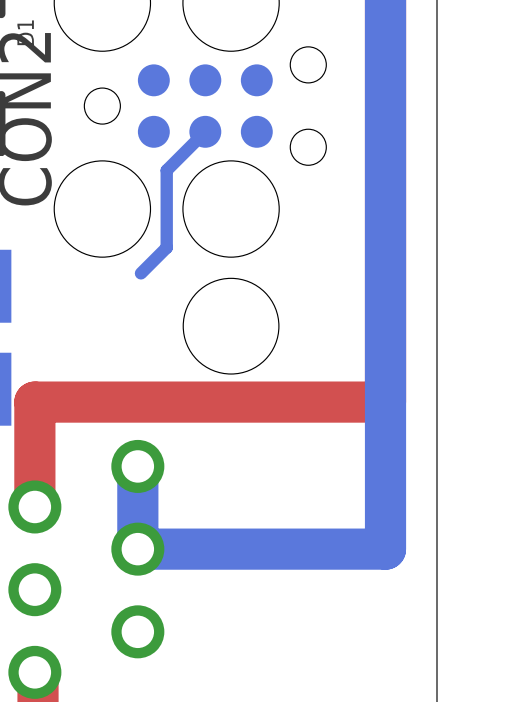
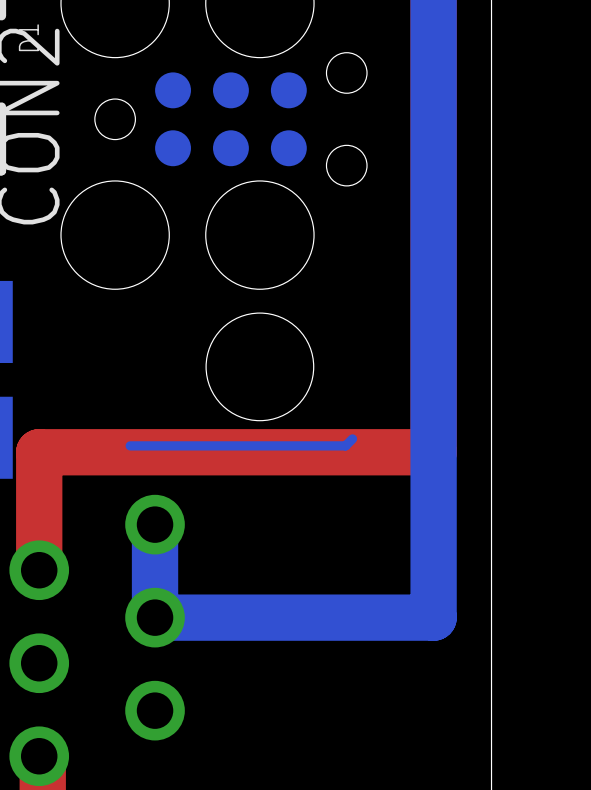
bottom track: (205, 131) (166, 170) (166, 247) (140, 273) -> none
bottom track: none -> (352, 438) (345, 445) (130, 445)

